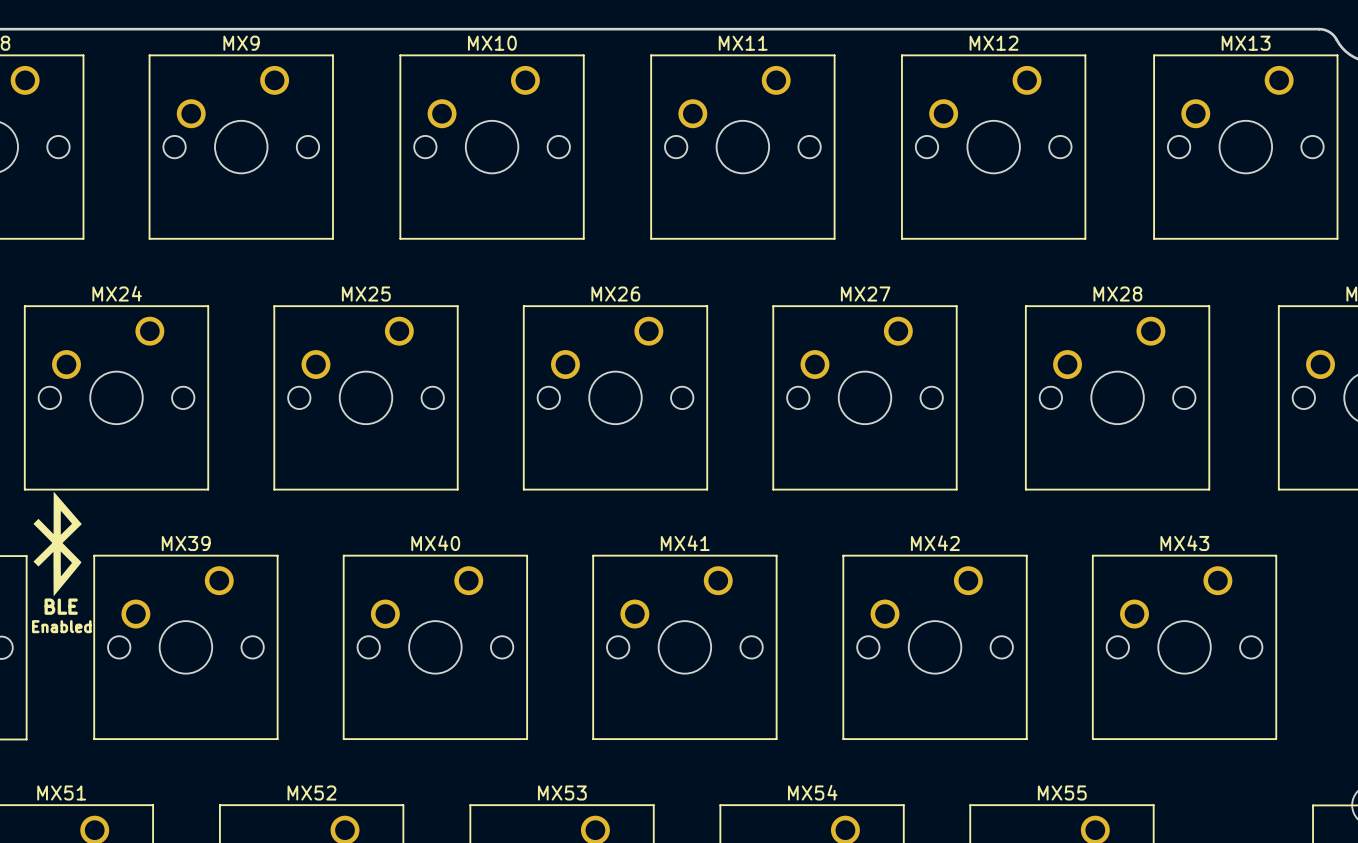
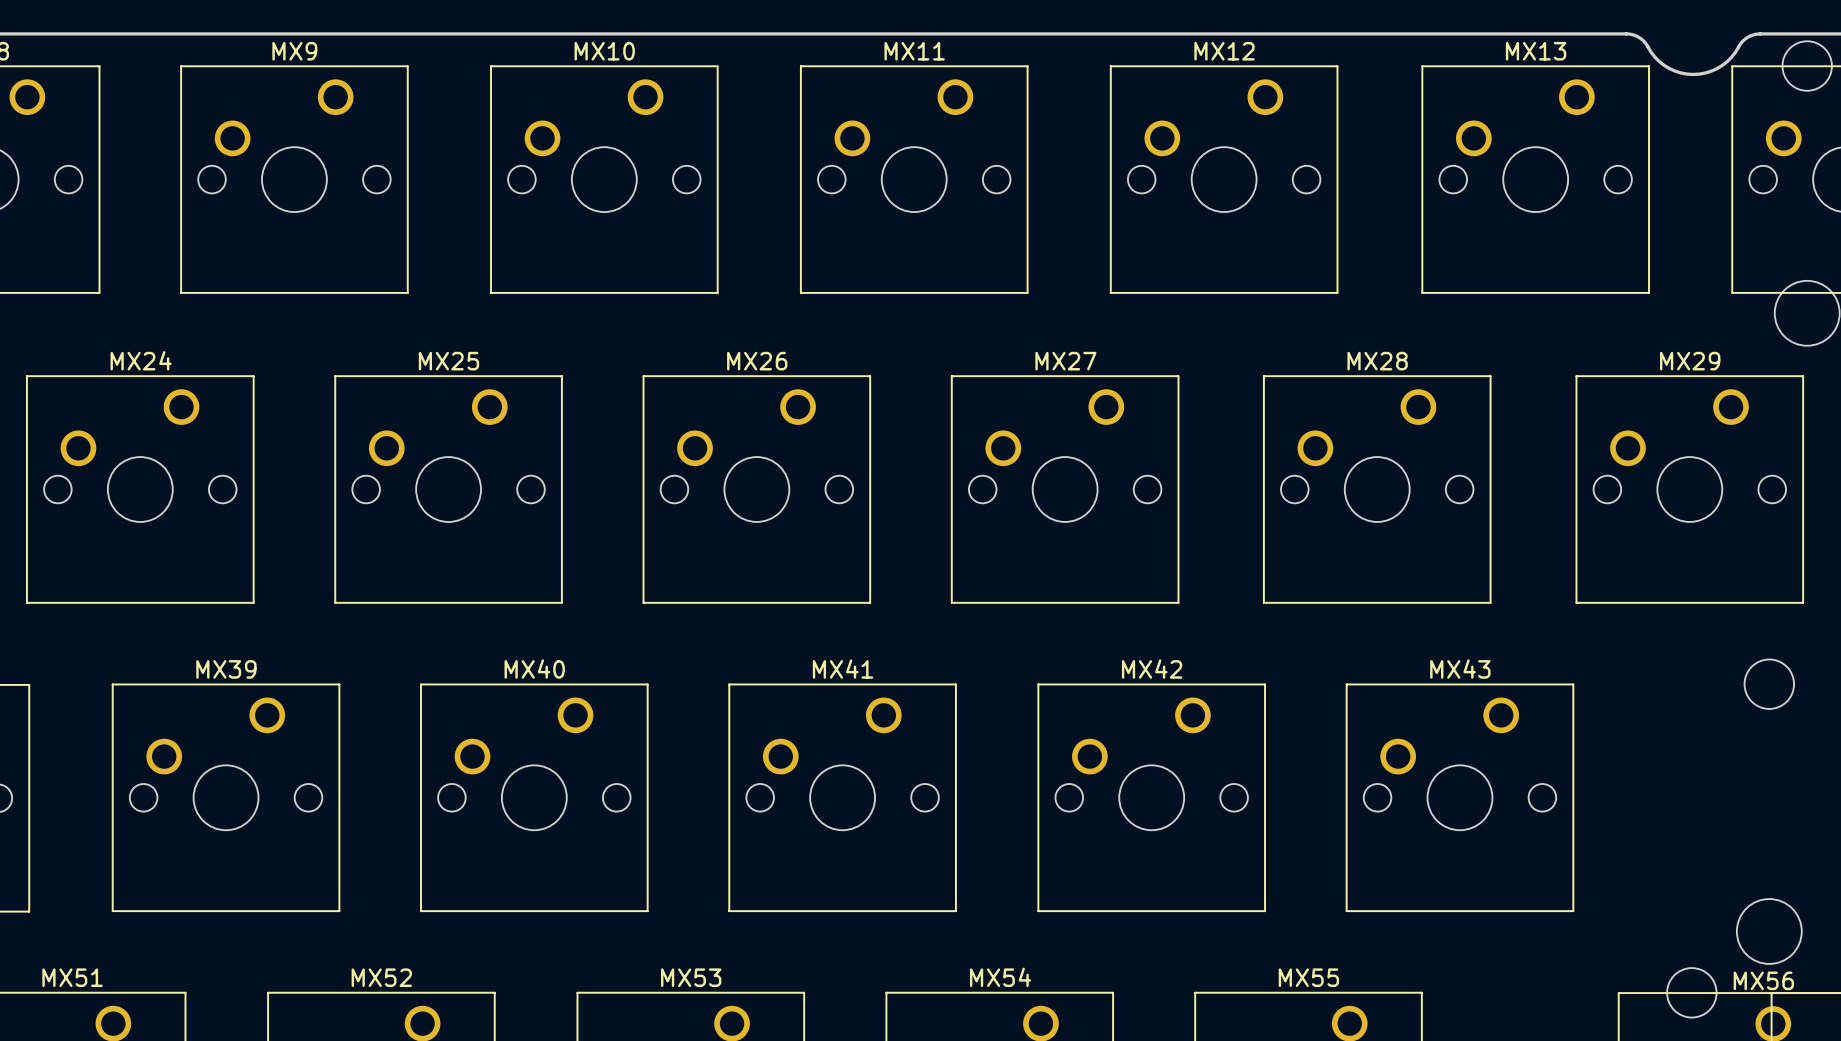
drawing: [33, 491, 82, 597] -> none
text: BLE (61, 606) -> none
text: Enabled (61, 626) -> none

